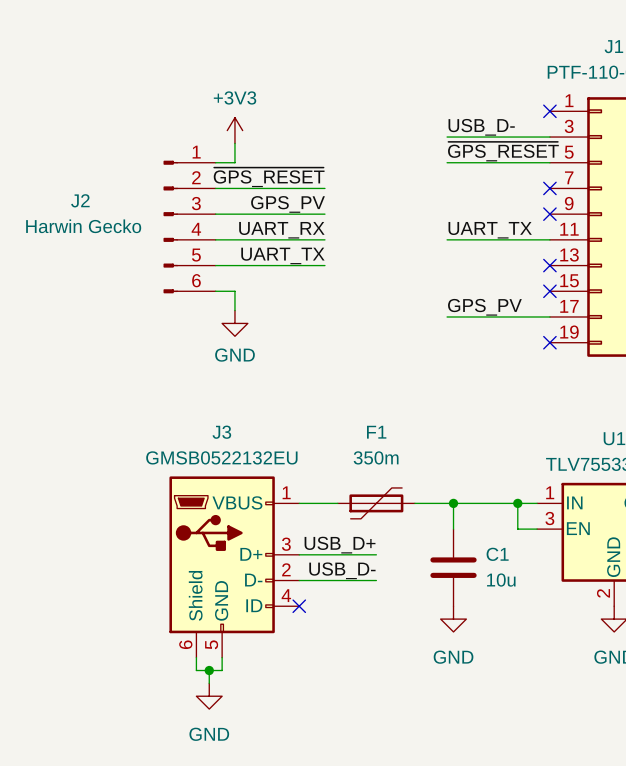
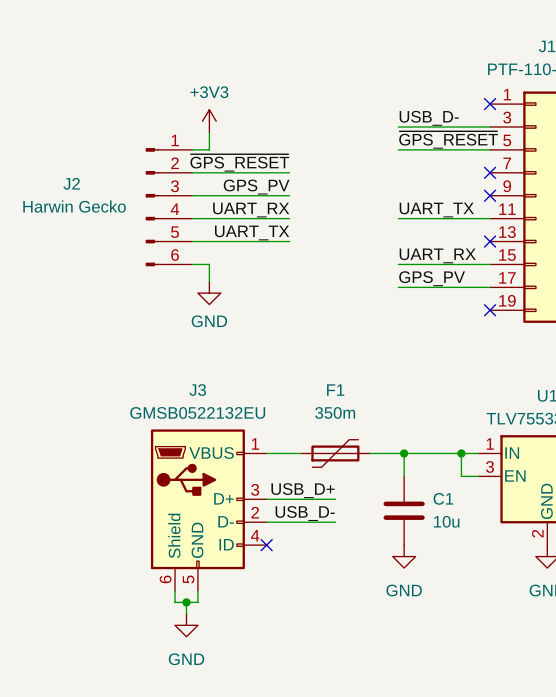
label: none -> UART_RX (437, 255)
wire: none -> (398, 264) (490, 264)
no-connect mark: (549, 291) -> none

